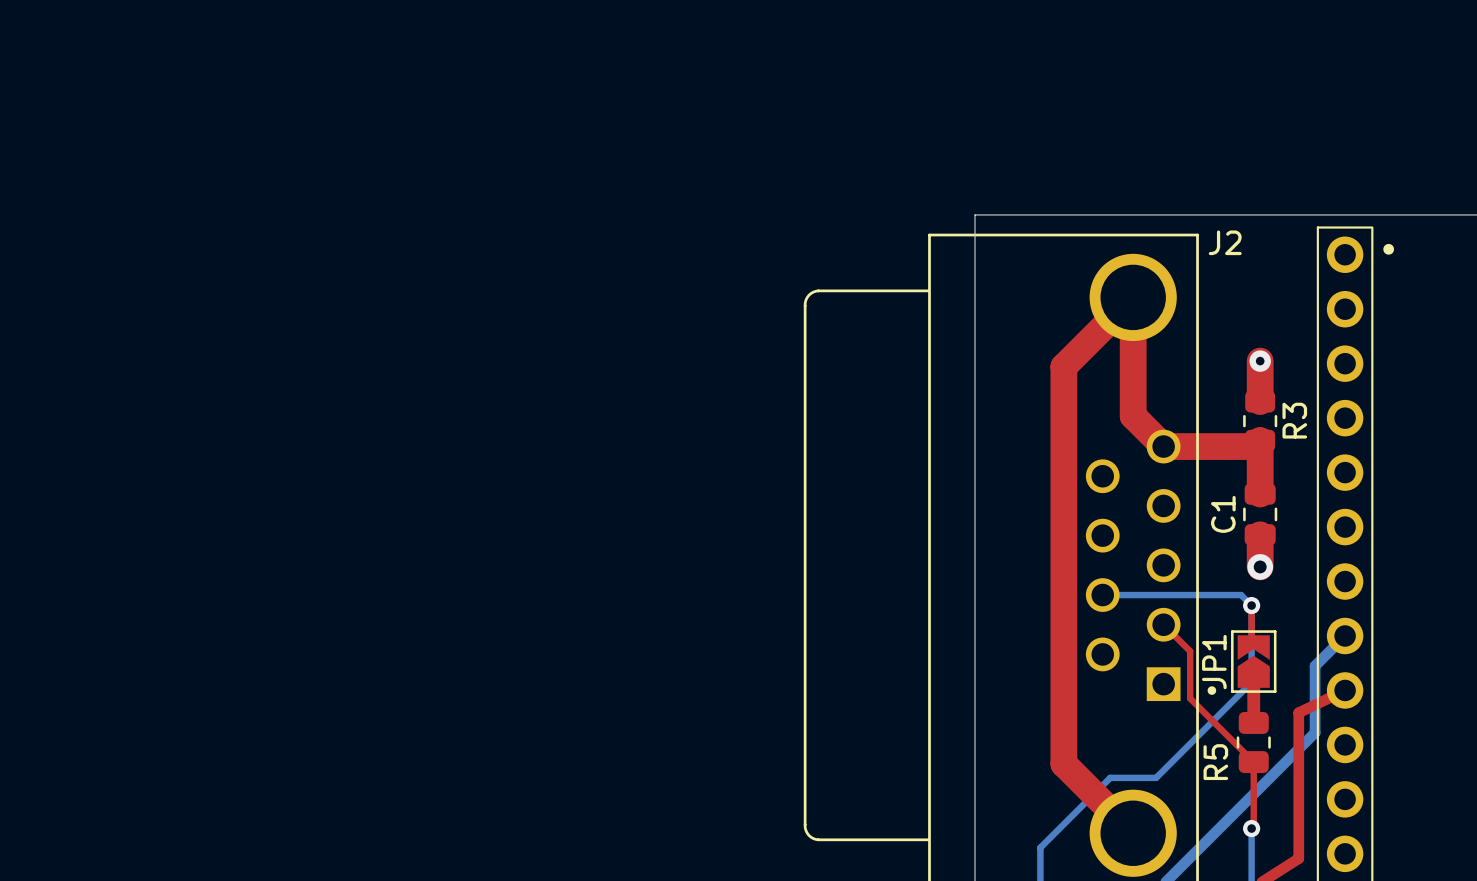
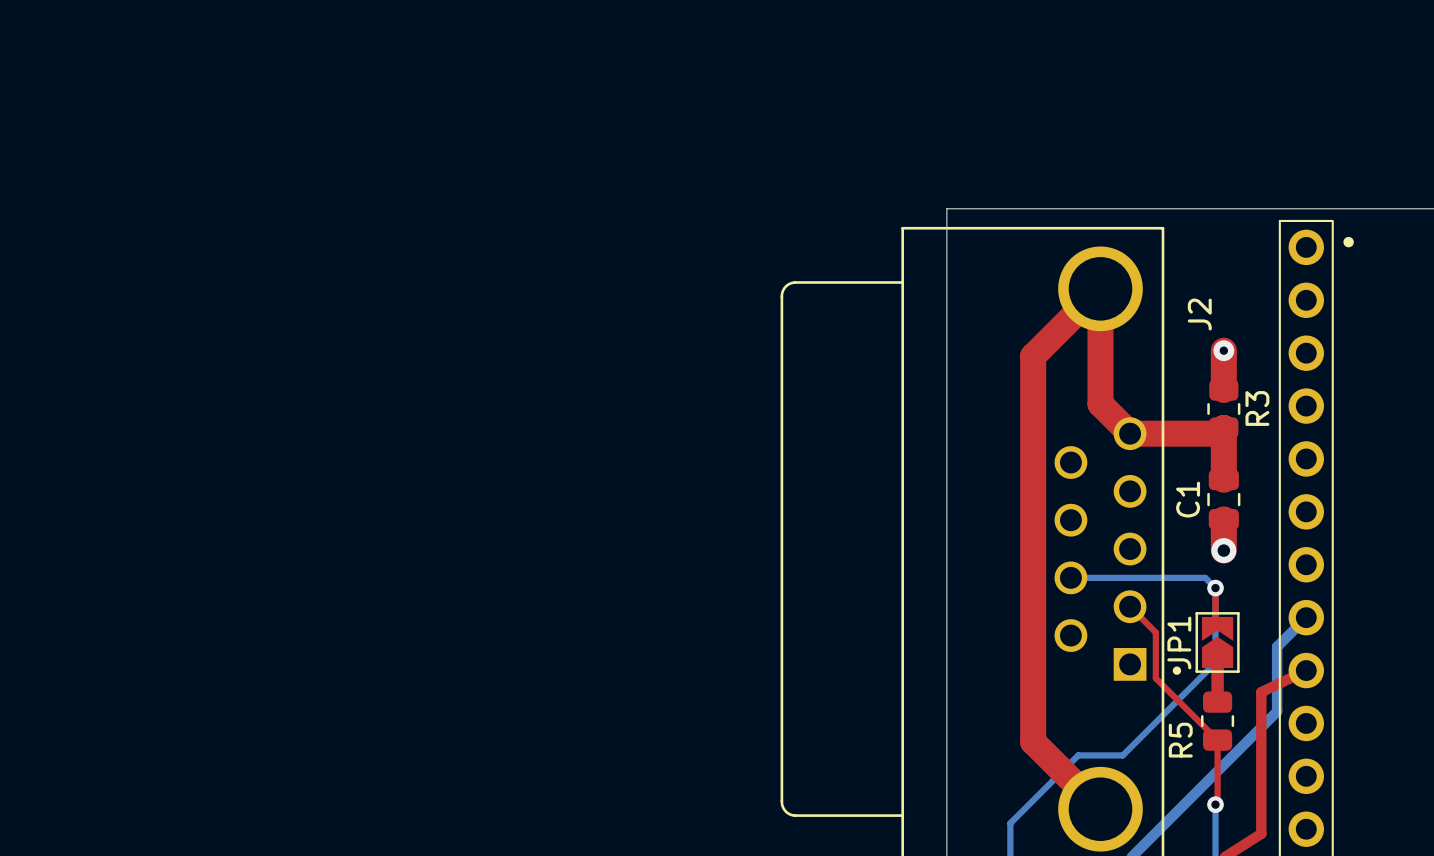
J2 name rotation: 0° (1225, 242) -> 90° counterclockwise (1199, 314)
J2 name position: J2 (1225, 242) -> J2 (1199, 314)

